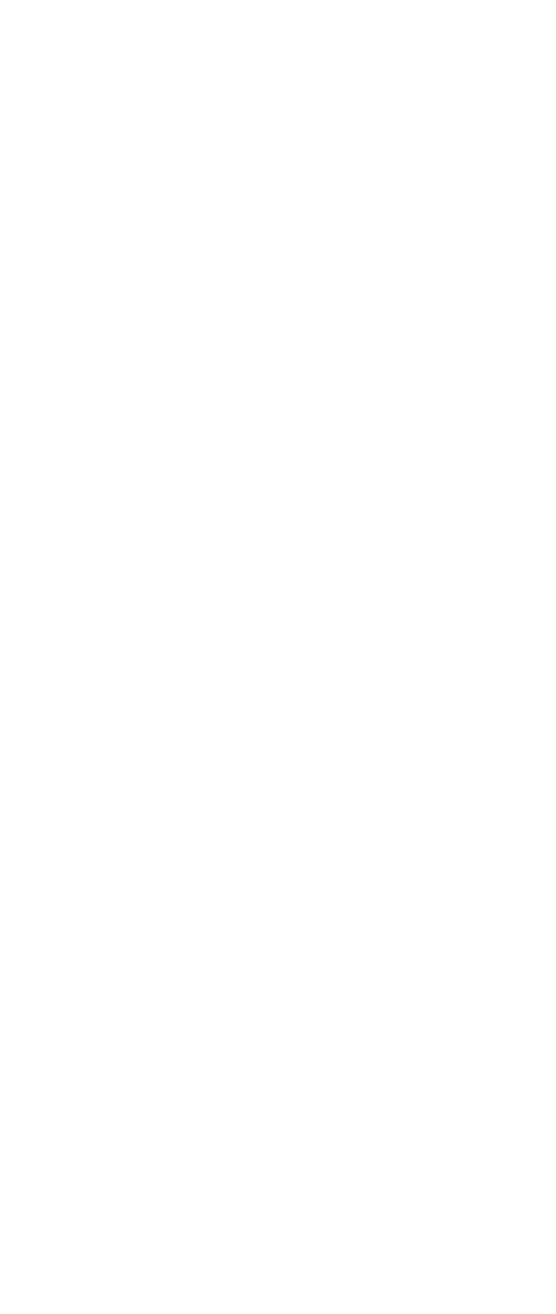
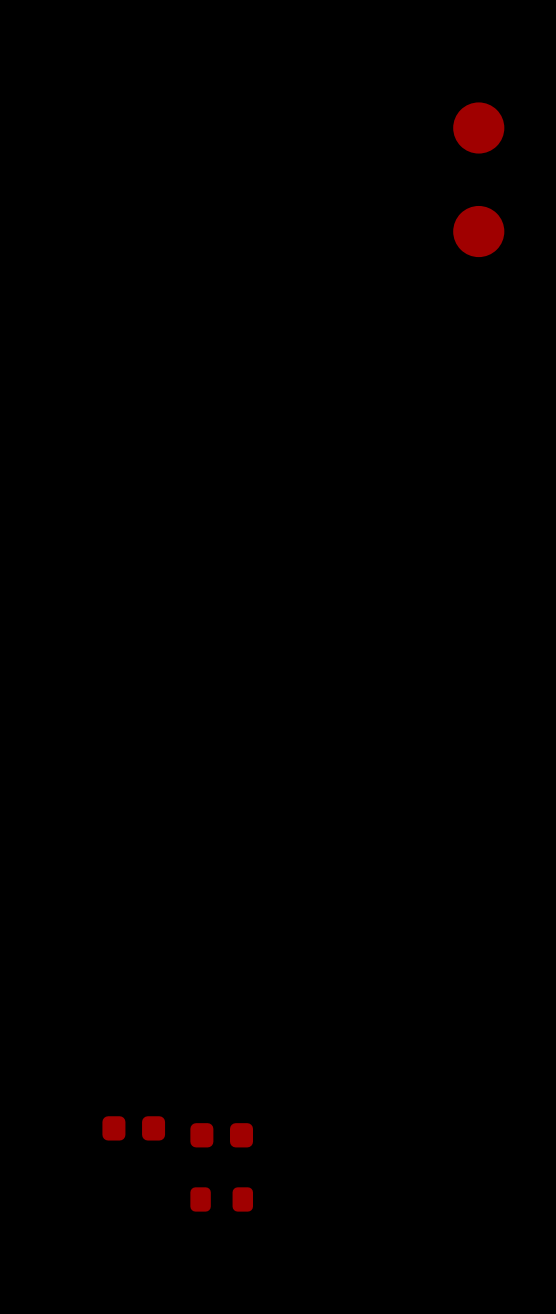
part: none -> (478, 127)
part: none -> (478, 231)
part: none -> (133, 1128)
part: none -> (221, 1135)
part: none -> (221, 1199)

